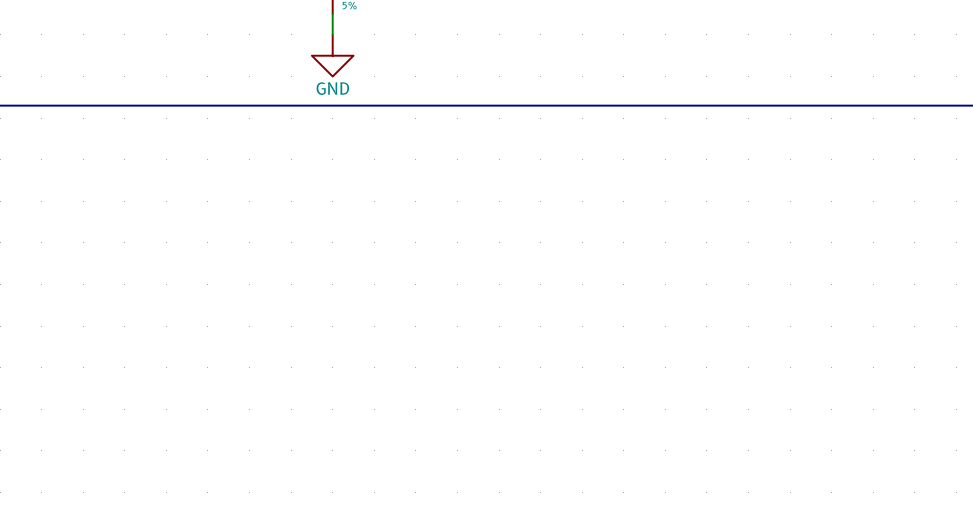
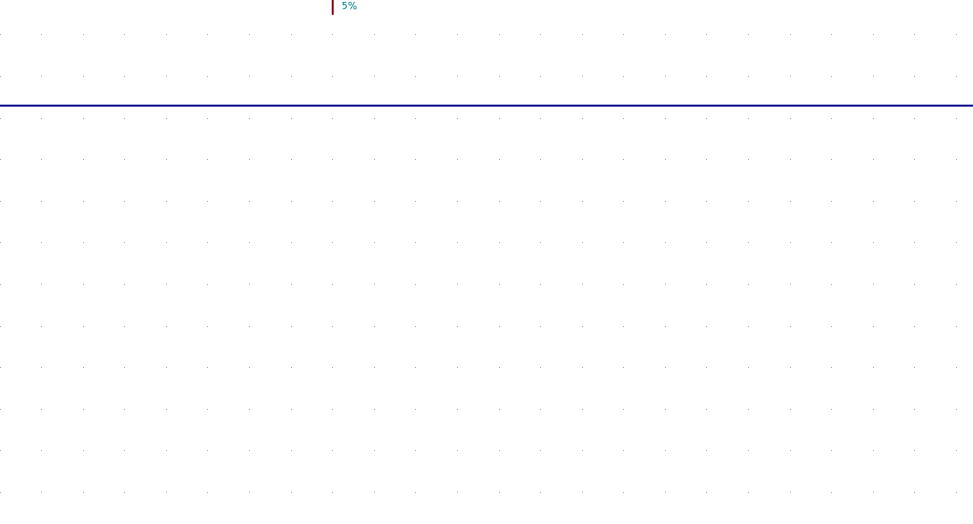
wire: (332, 14) (332, 34) -> none
power symbol: GND (332, 55) -> none

